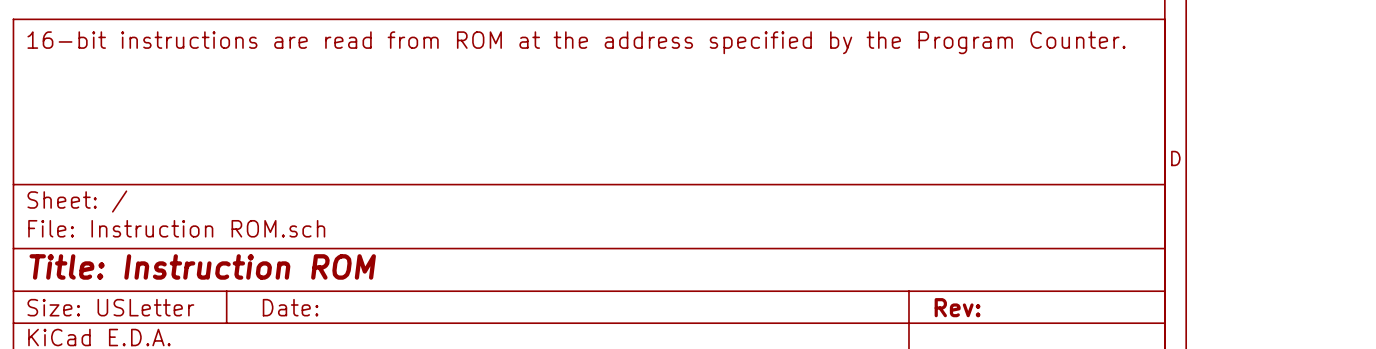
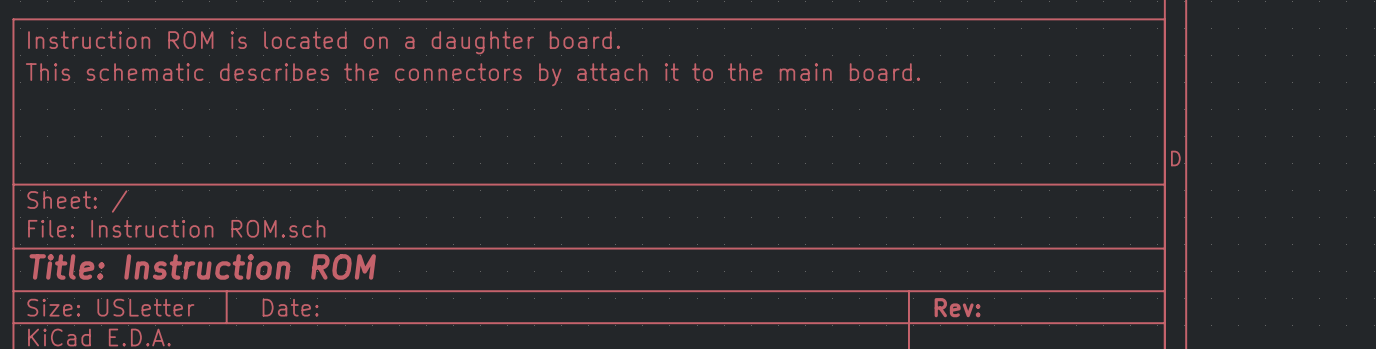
title block: 16-bit instructions are read from ROM at the address specified by the Program Counter. (576, 42) -> Instruction ROM is located on a daughter board. (324, 42)
title block: none -> This schematic describes the connectors by attach it to the main board. (472, 74)

